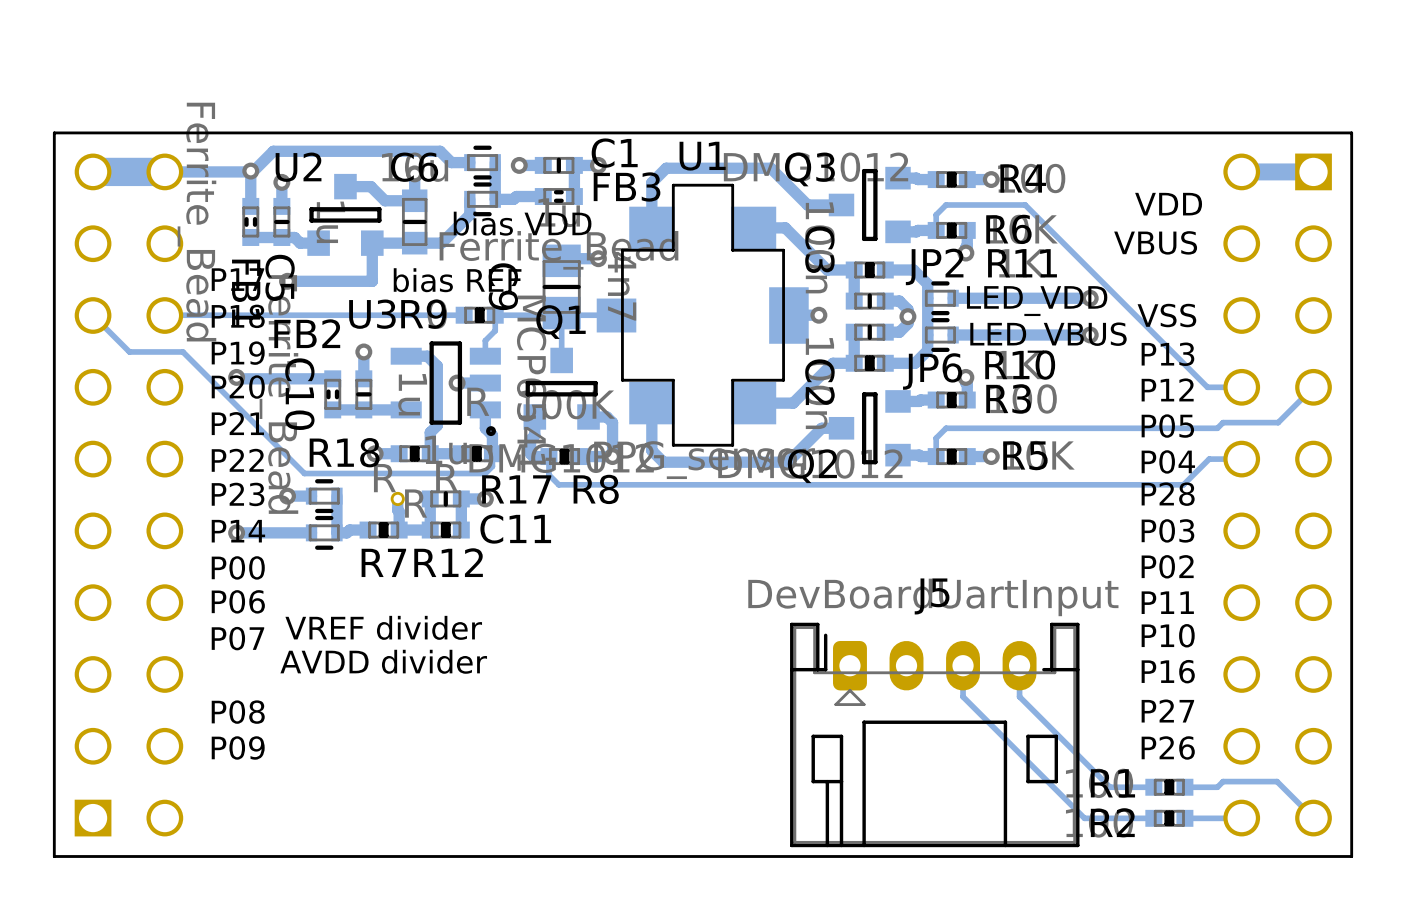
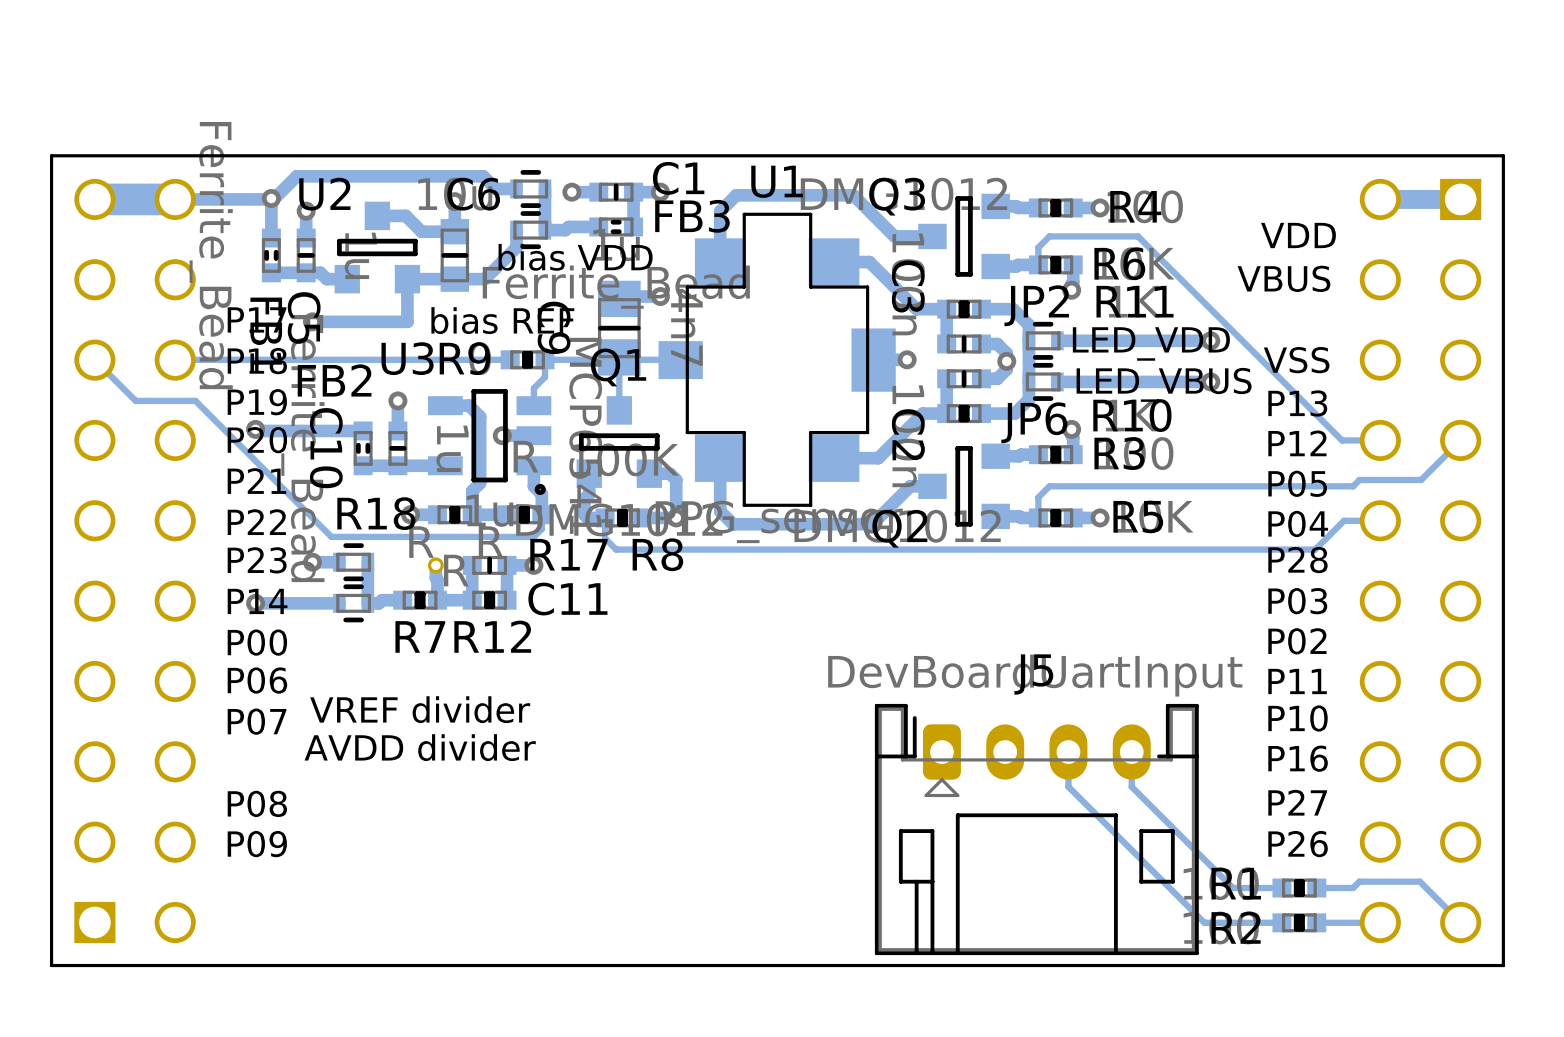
C6 name position: C6 (414, 167) -> C6 (473, 194)

